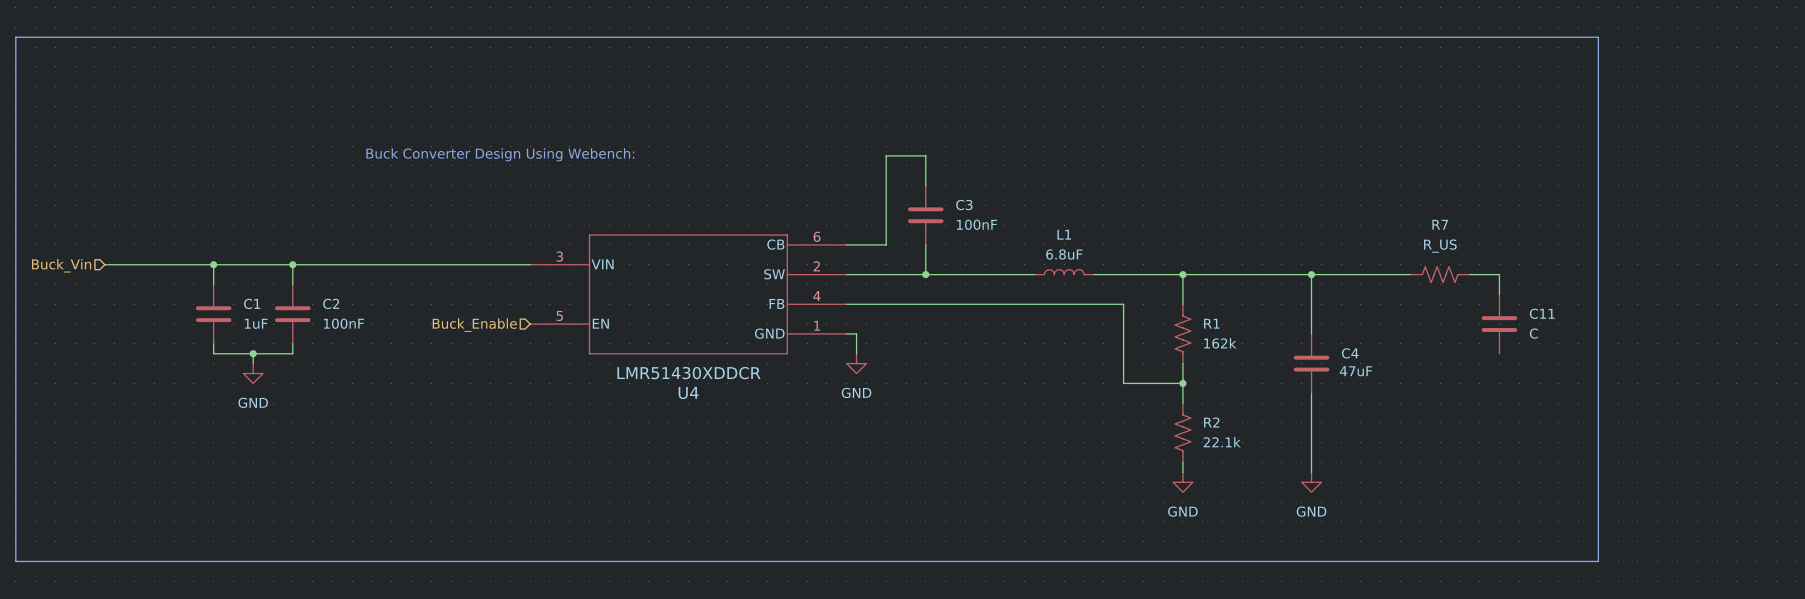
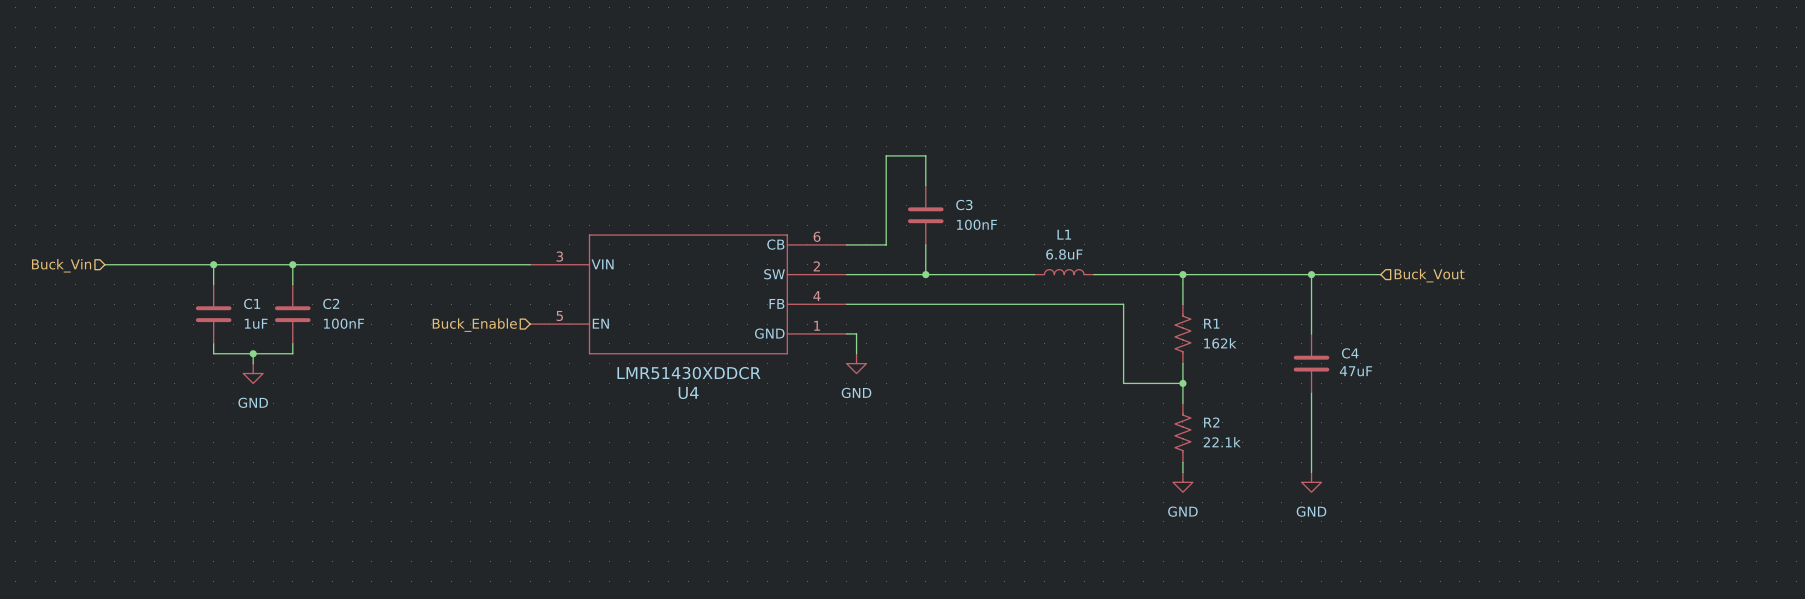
line: (15, 37) (1598, 37) (1598, 561) (15, 561) (15, 37) -> none
text: Buck Converter Design Using Webench: (500, 154) -> none
wire: (1380, 274) (1410, 274) -> none
R7: R_US (1440, 274) -> none
wire: (1469, 274) (1499, 274) (1499, 294) -> none
hierarchical label: none -> Buck_Vout (1429, 275)
C11: C (1499, 324) -> none

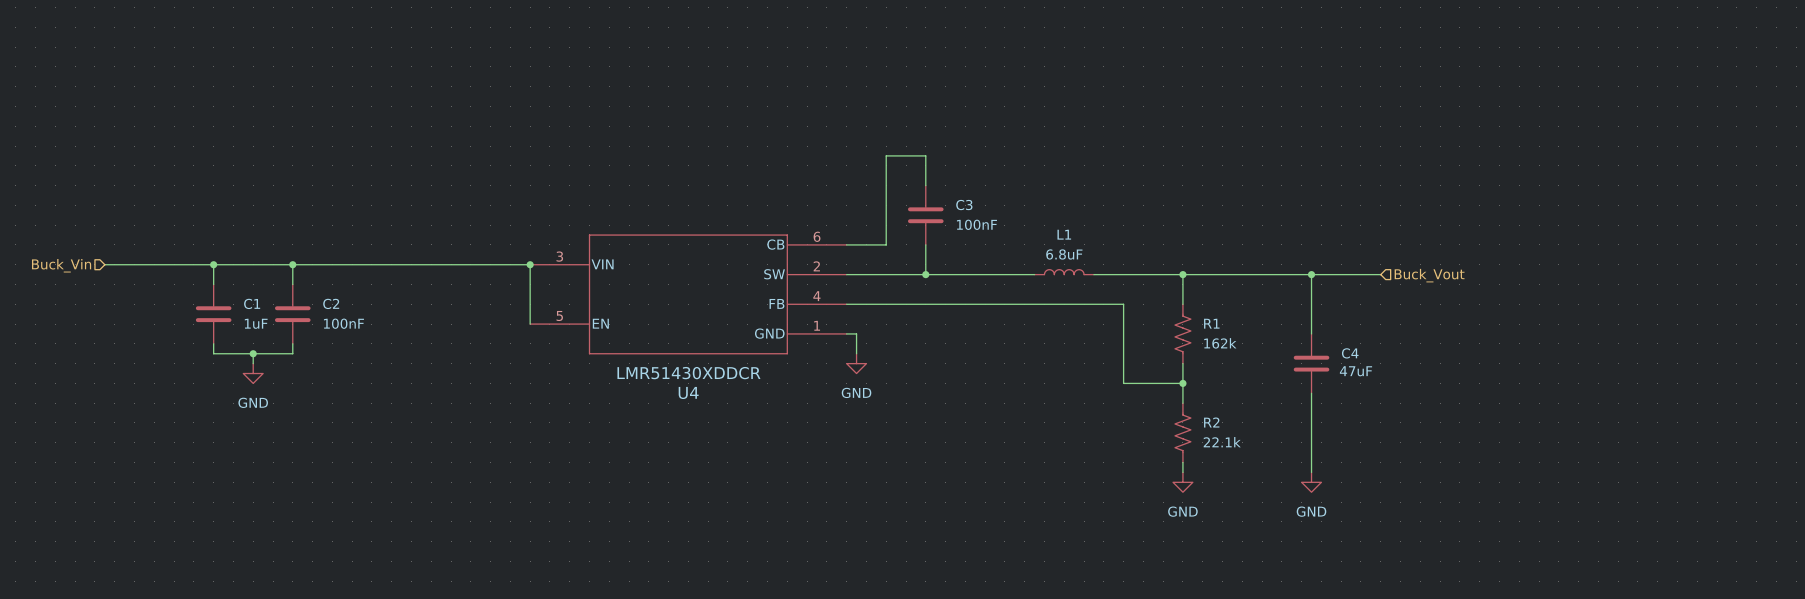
wire: none -> (530, 264) (530, 324)
junction: none -> (530, 264)
hierarchical label: Buck_Enable (474, 325) -> none

